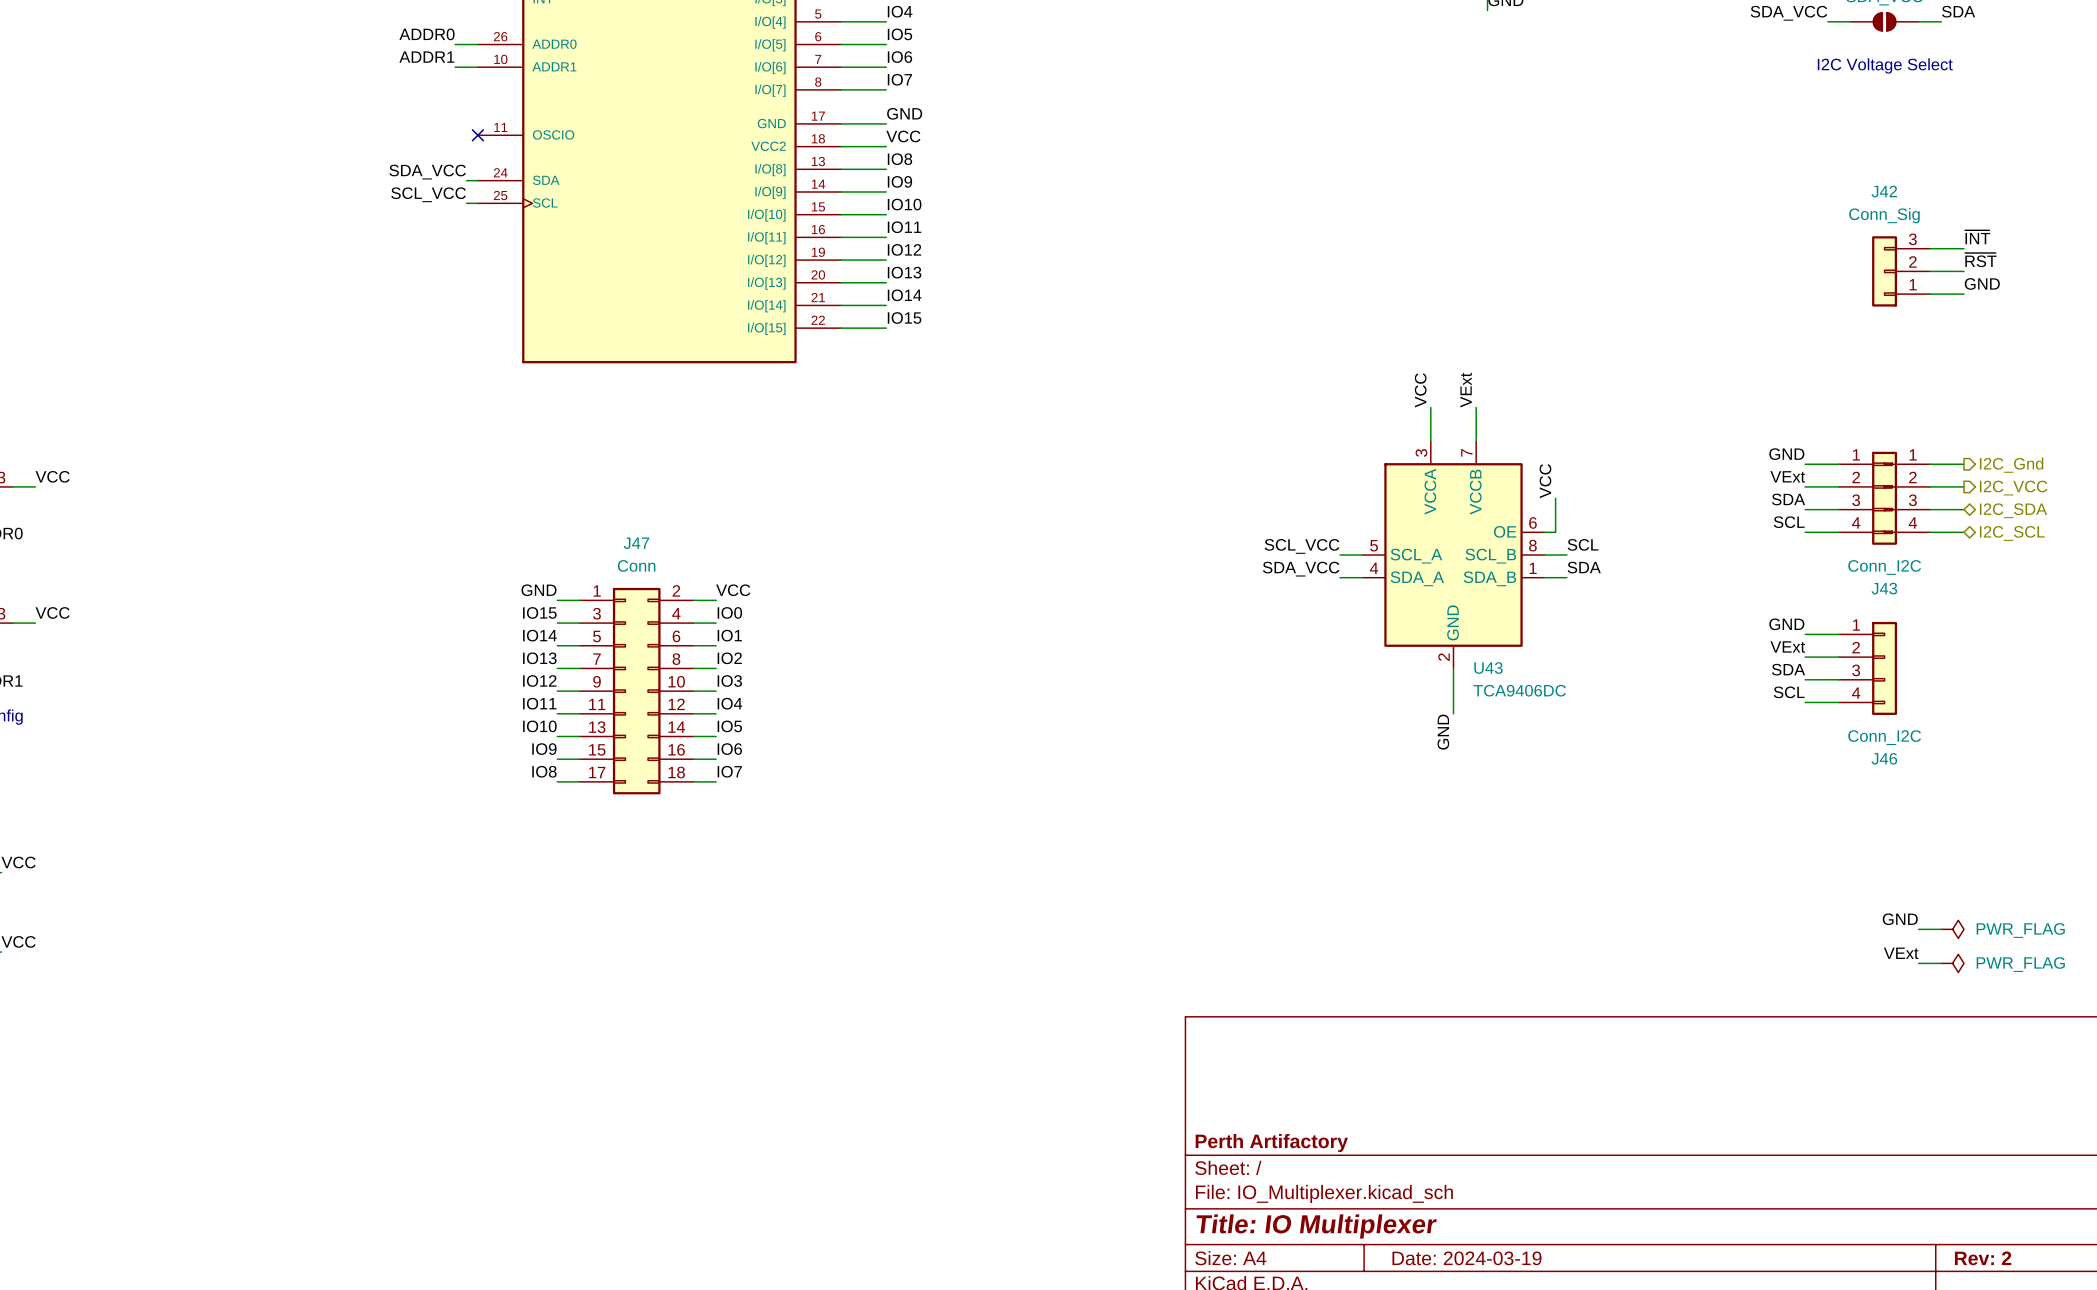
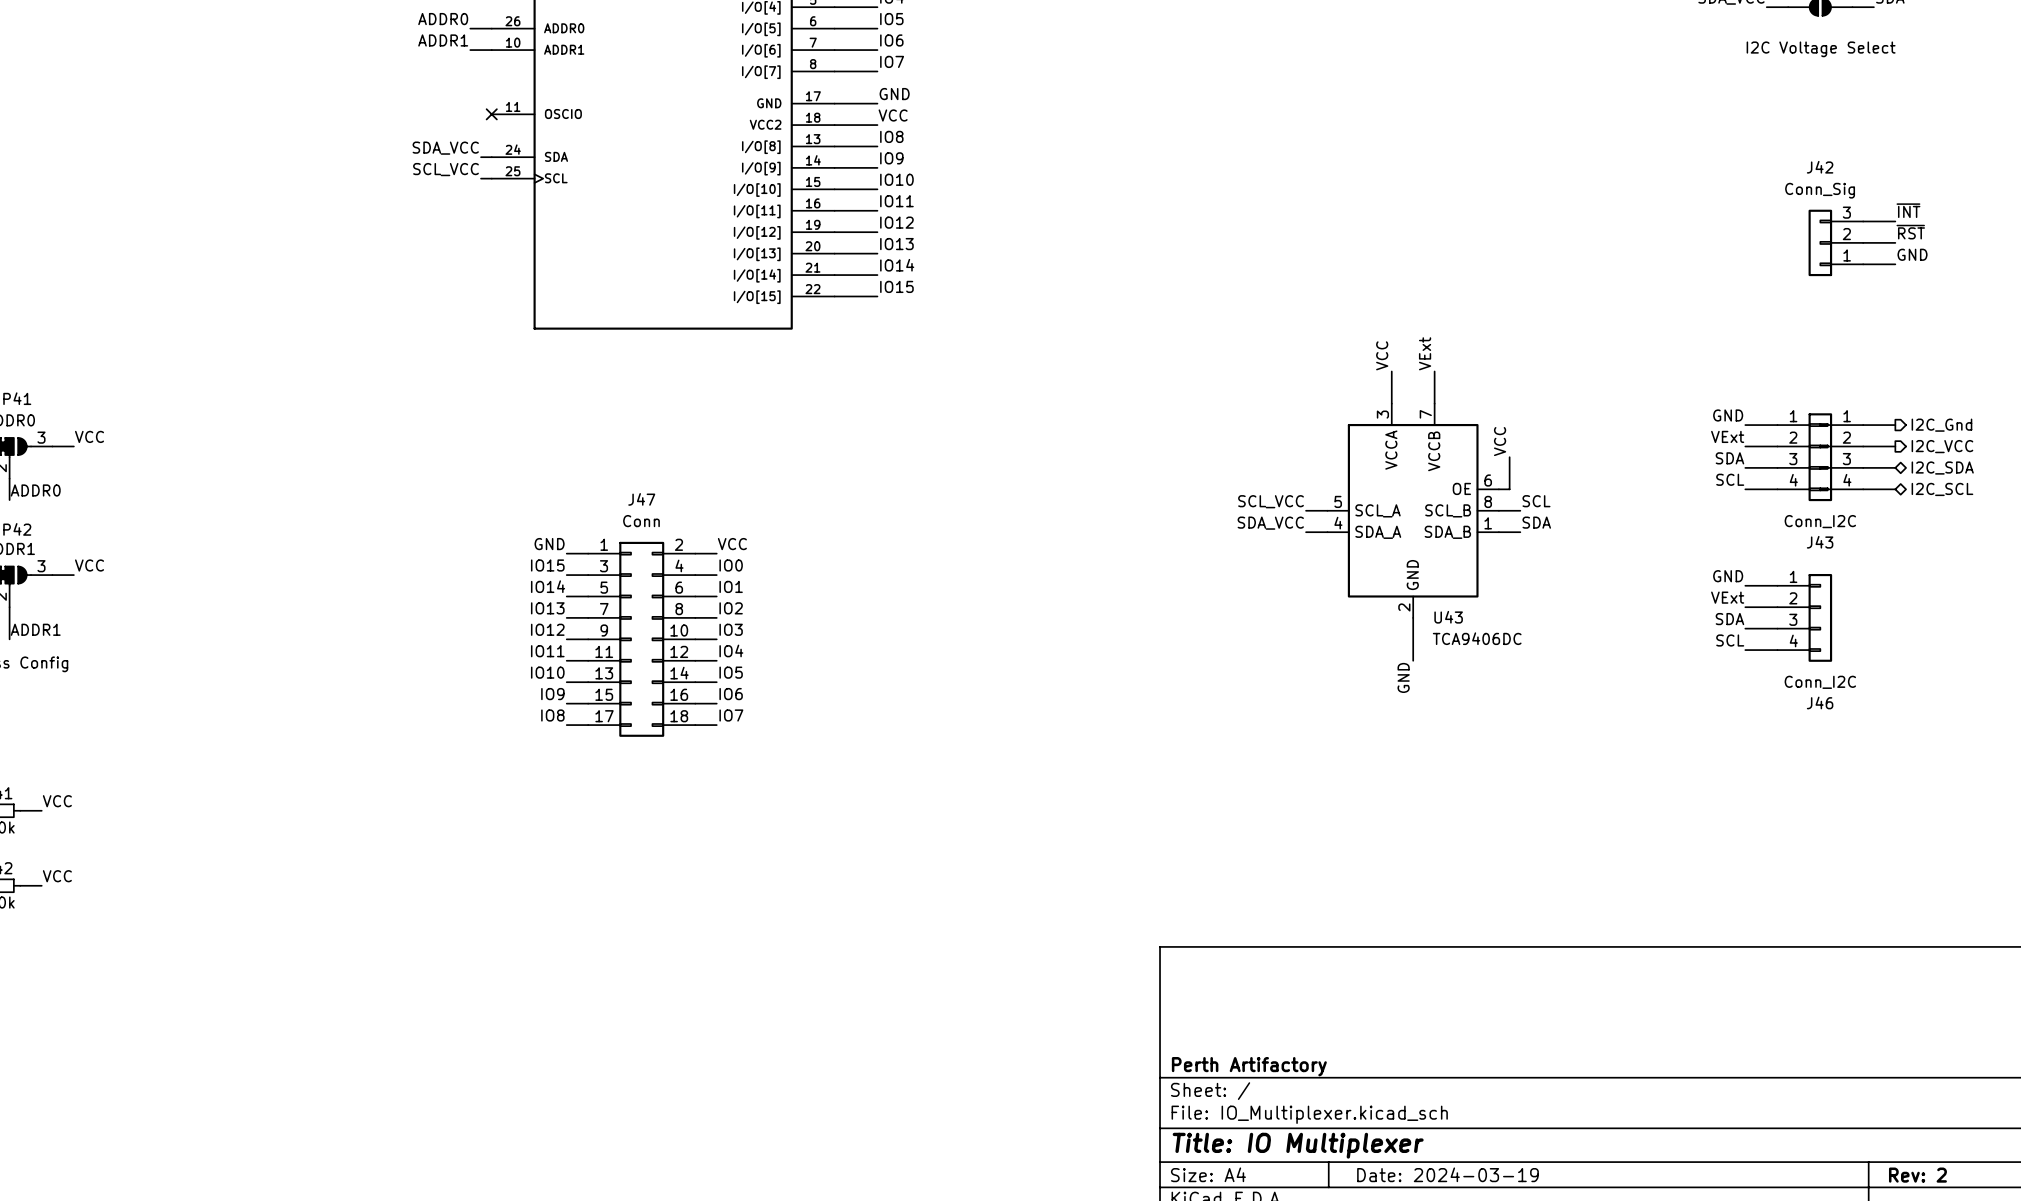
label: GND (1900, 919) -> none
wire: (1918, 929) (1941, 929) -> none
power symbol: PWR_FLAG (1952, 929) -> none
label: VExt (1901, 953) -> none
wire: (1918, 963) (1941, 963) -> none
power symbol: PWR_FLAG (1952, 963) -> none

